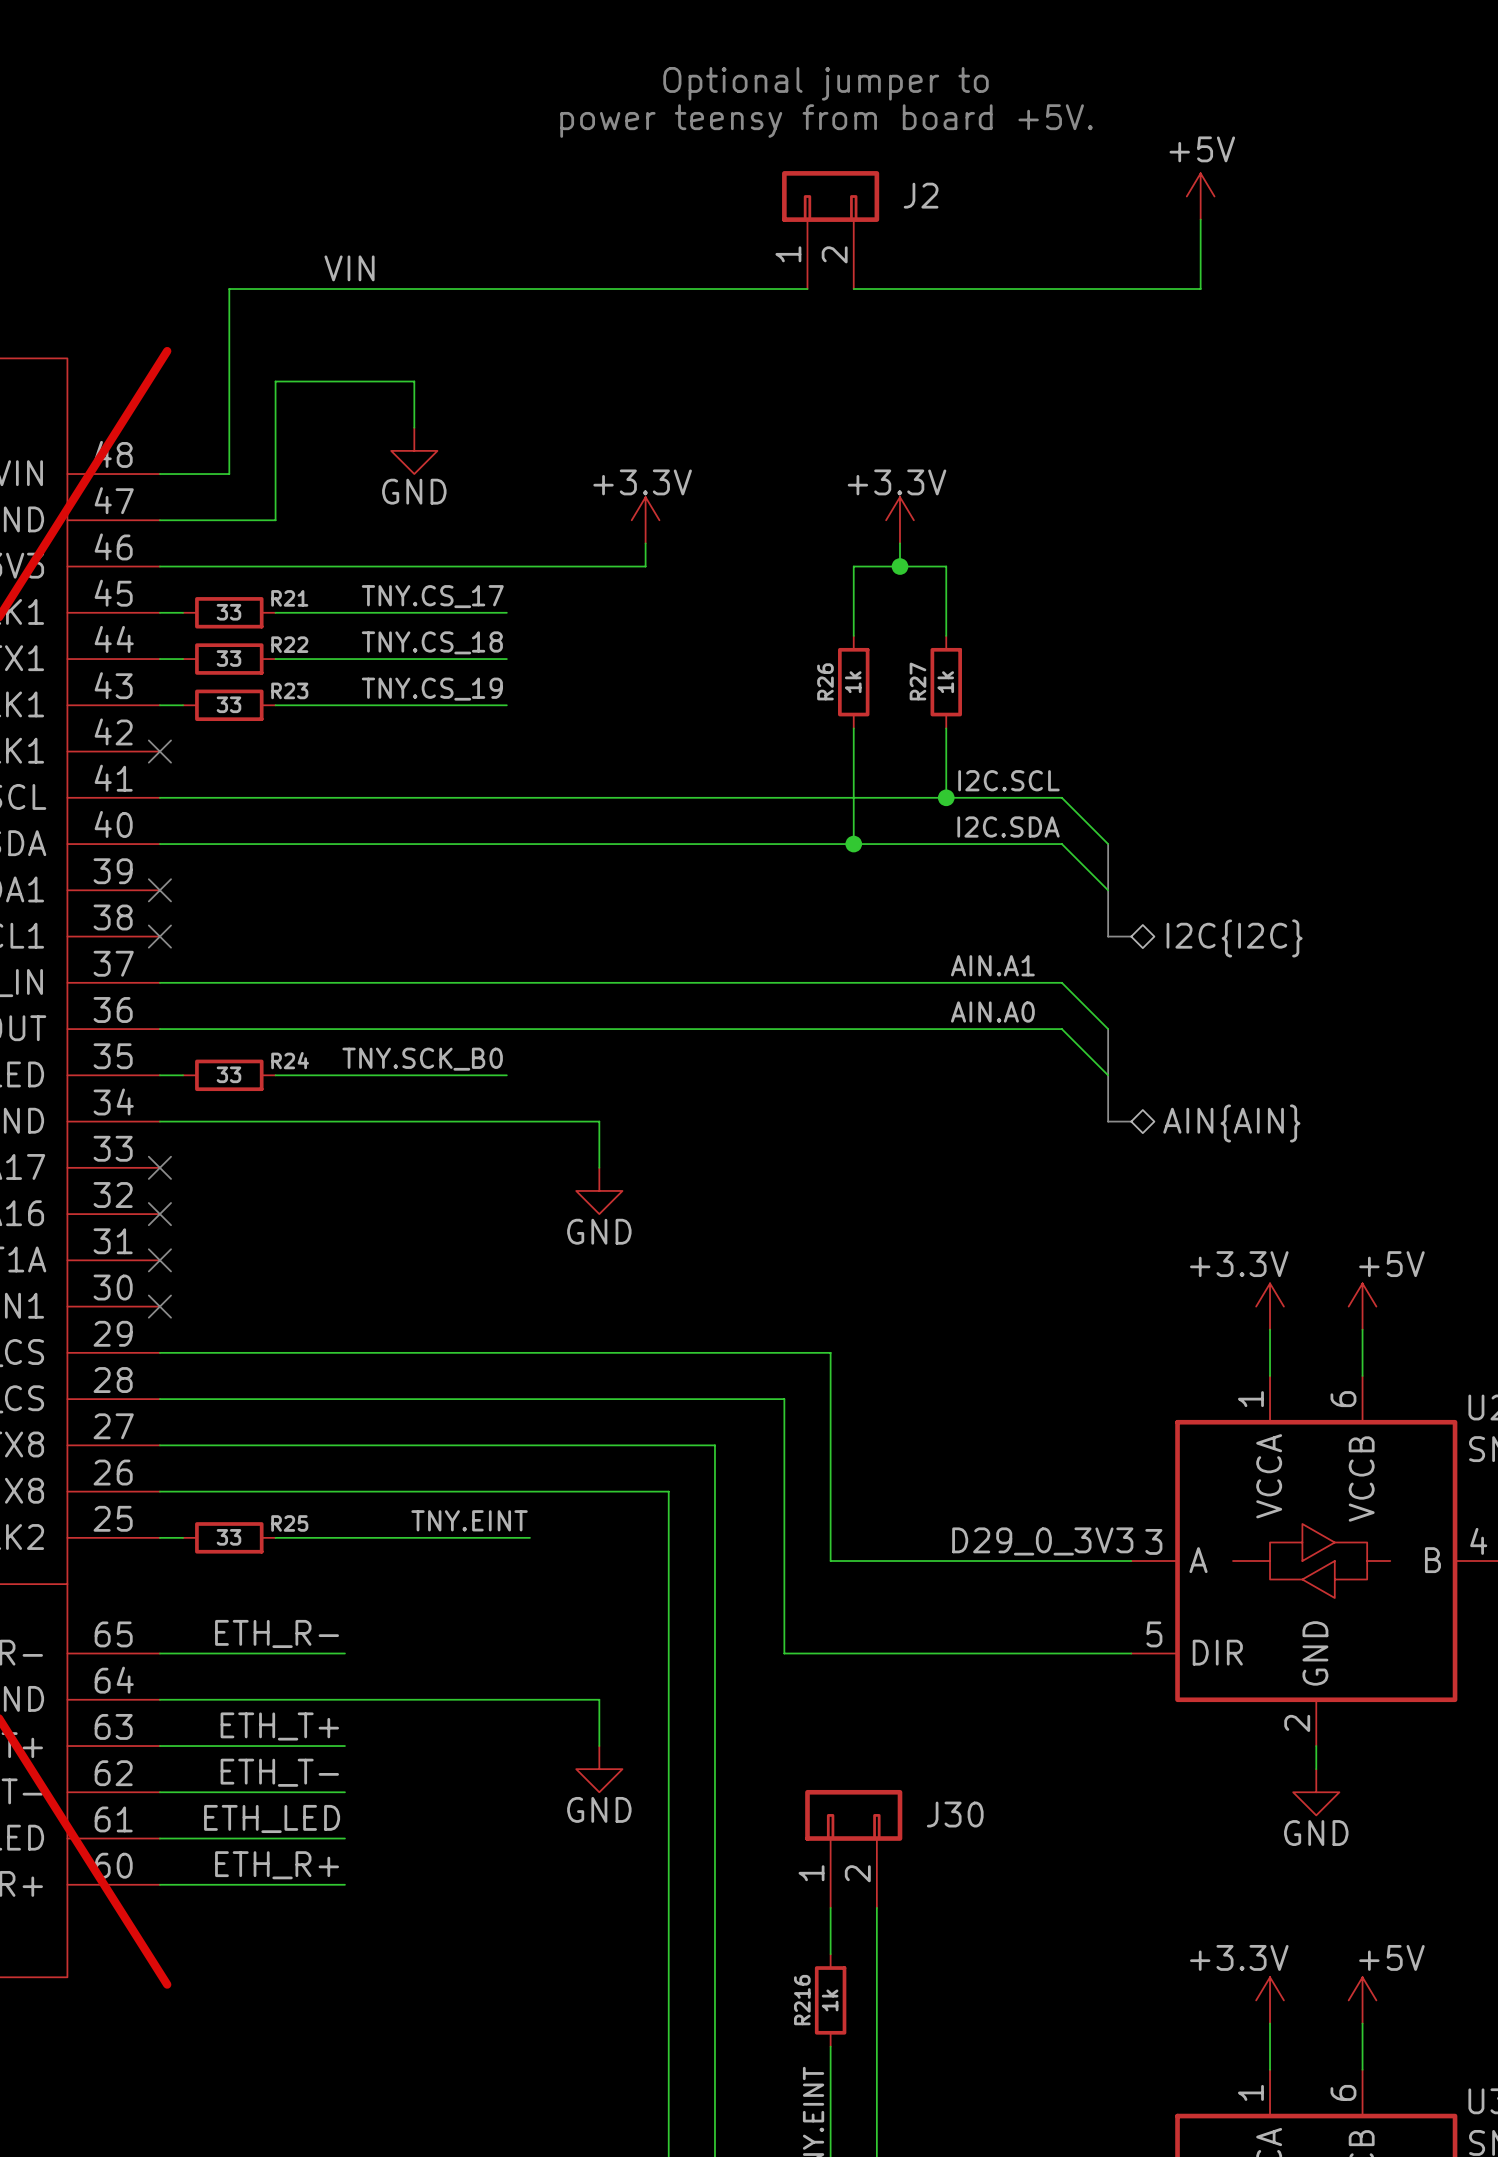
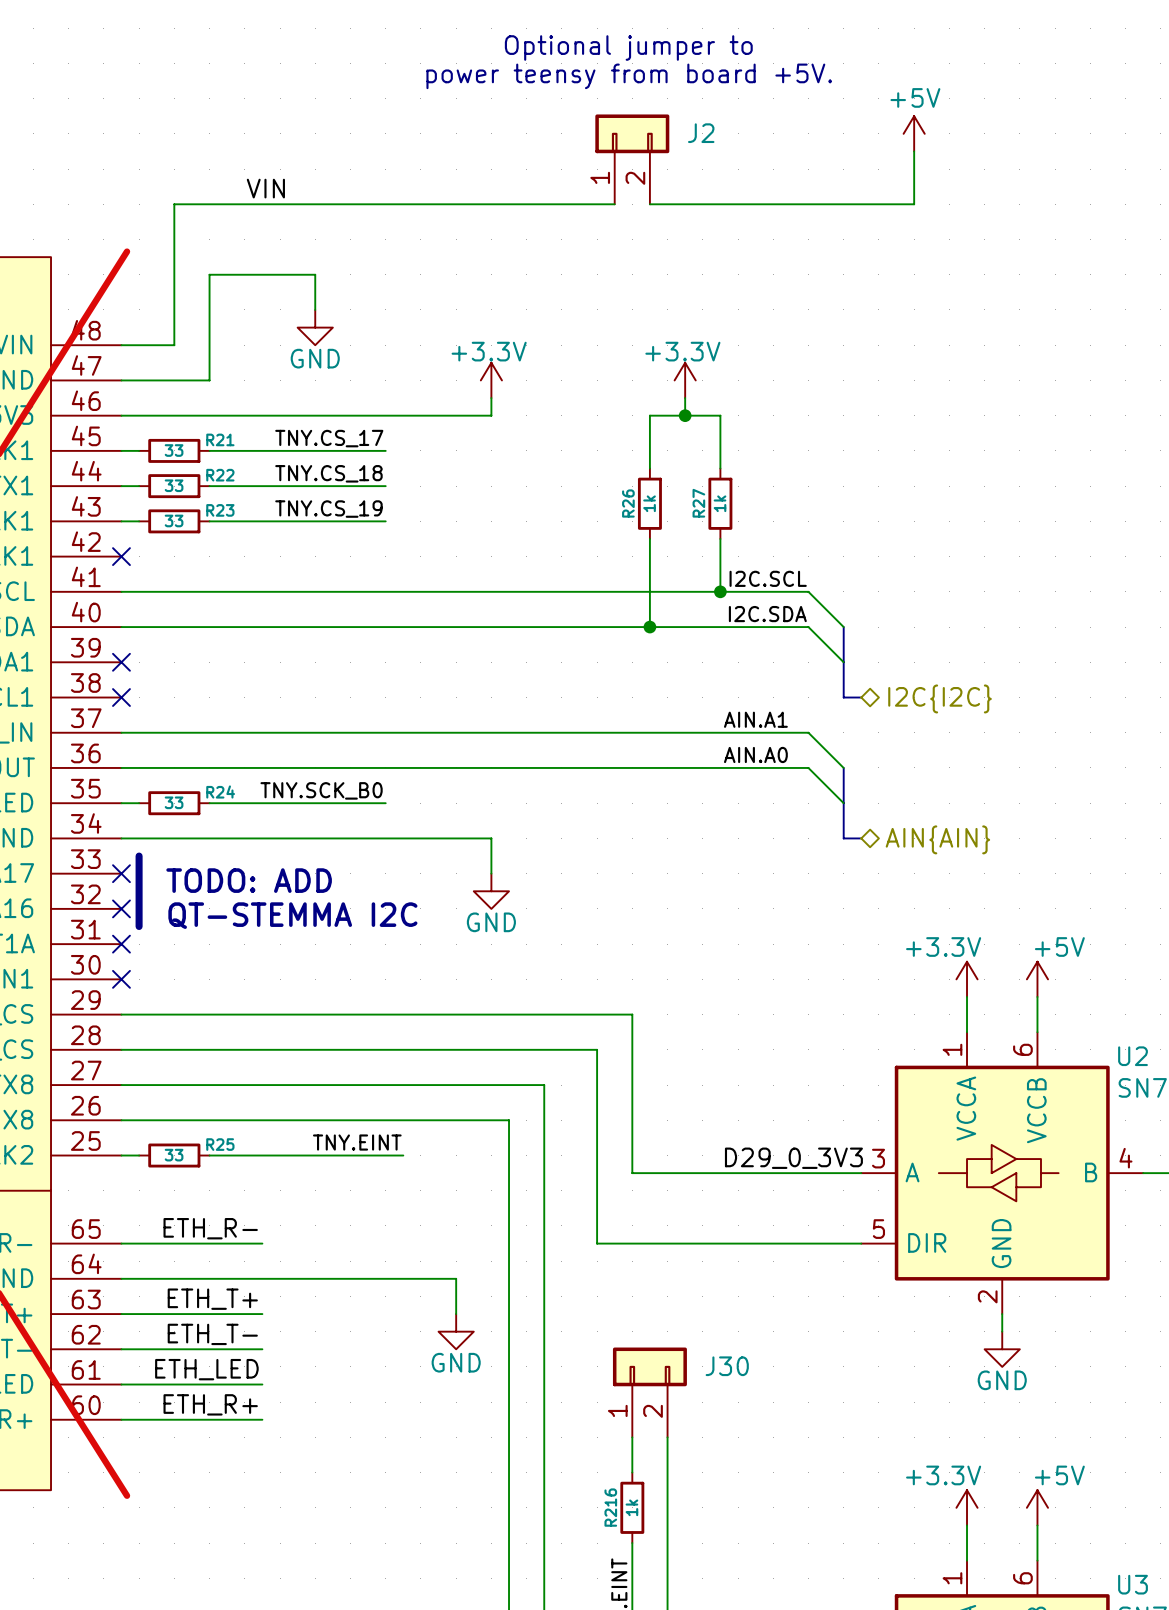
wire: (599, 1121) (599, 1167) -> (456, 838) (491, 838) (491, 873)
line: none -> (139, 856) (139, 926)
text: none -> TODO: ADD (249, 880)
power symbol position: GND (599, 1190) -> GND (491, 891)
text: none -> QT-STEMMA I2C (292, 915)

